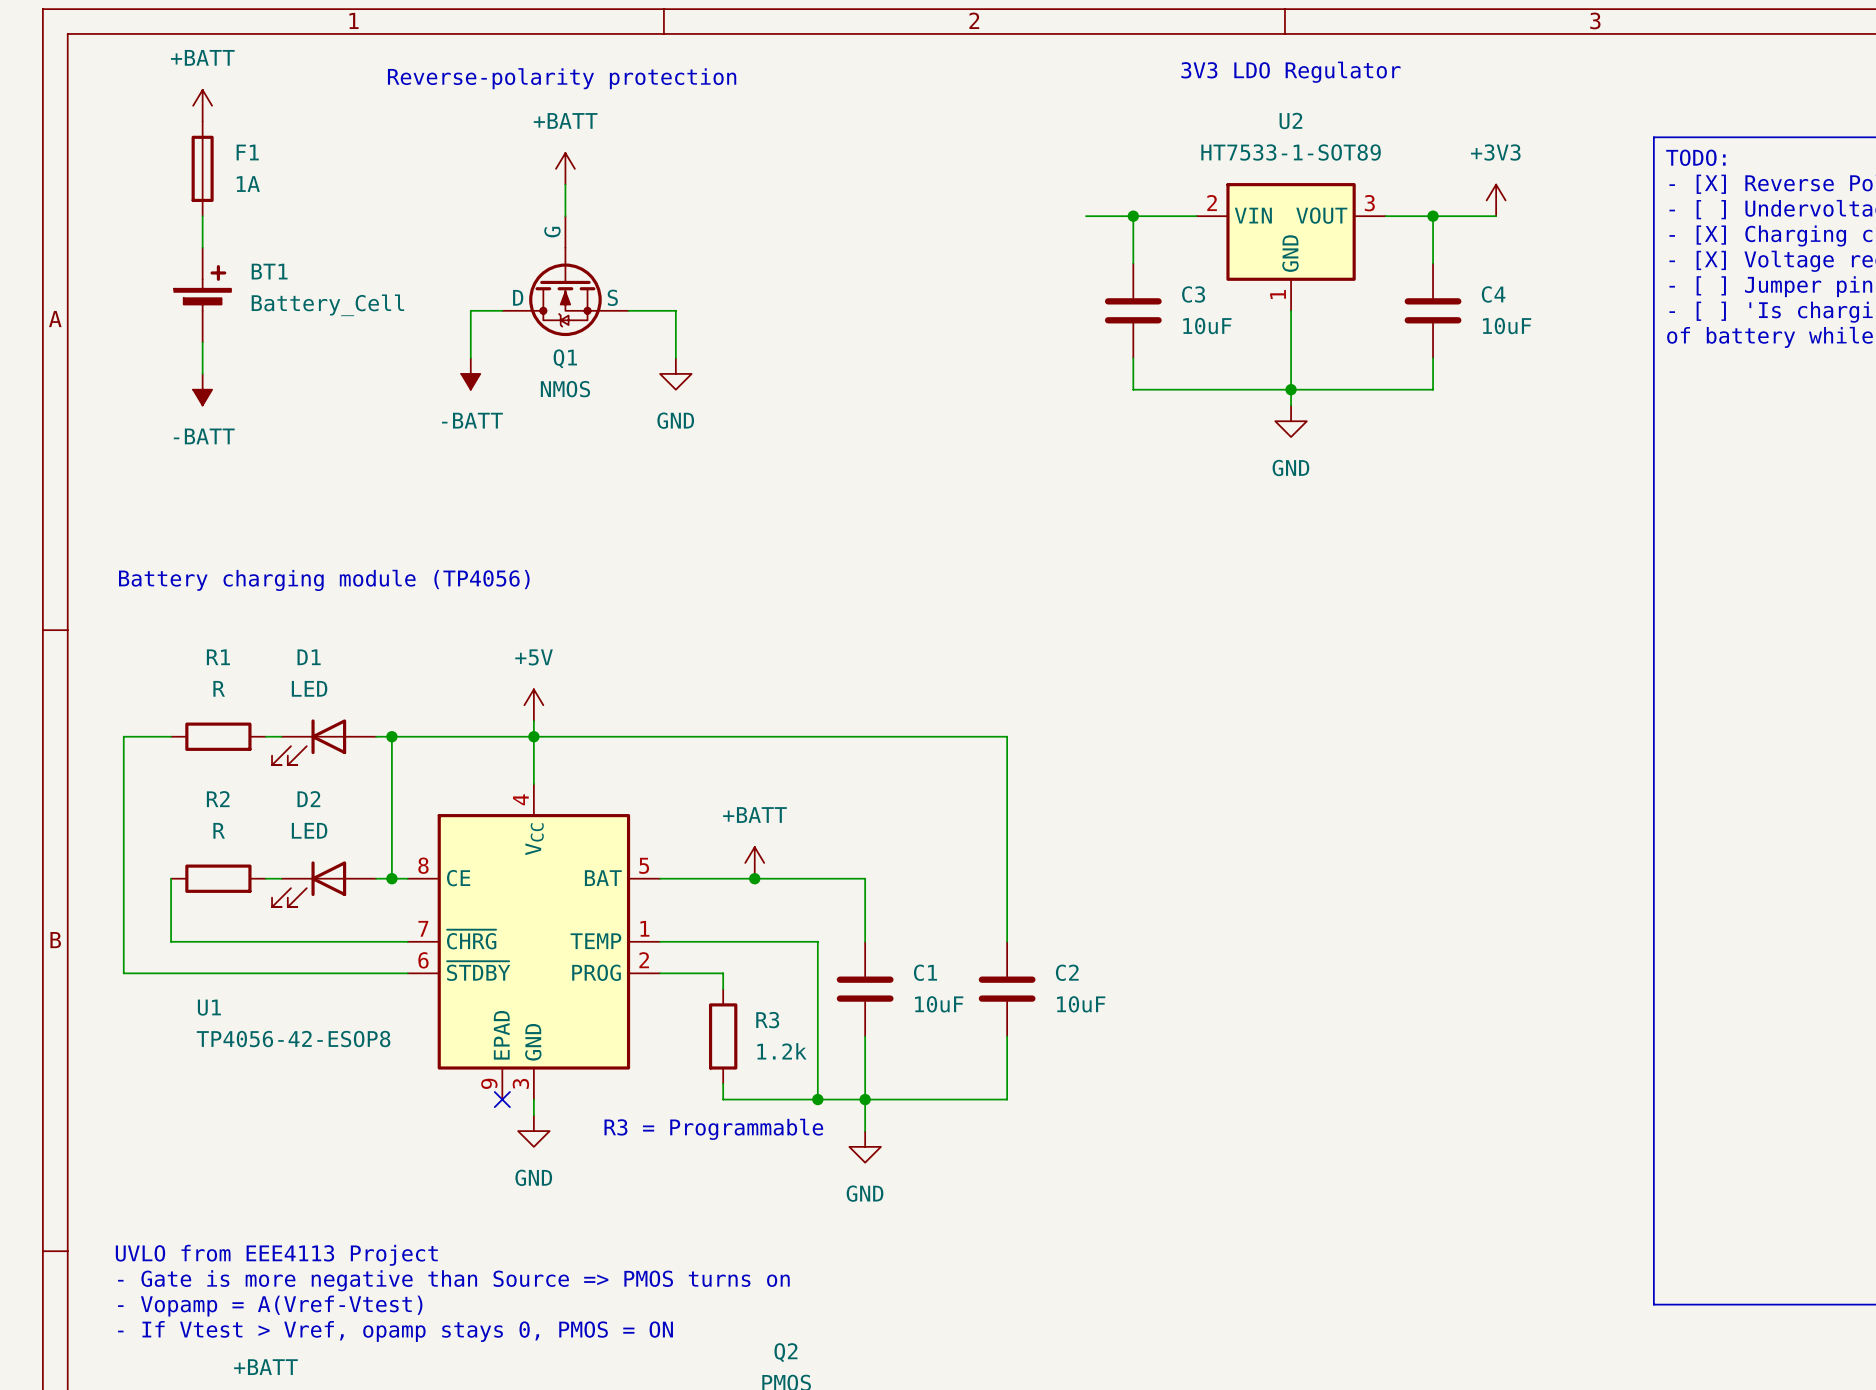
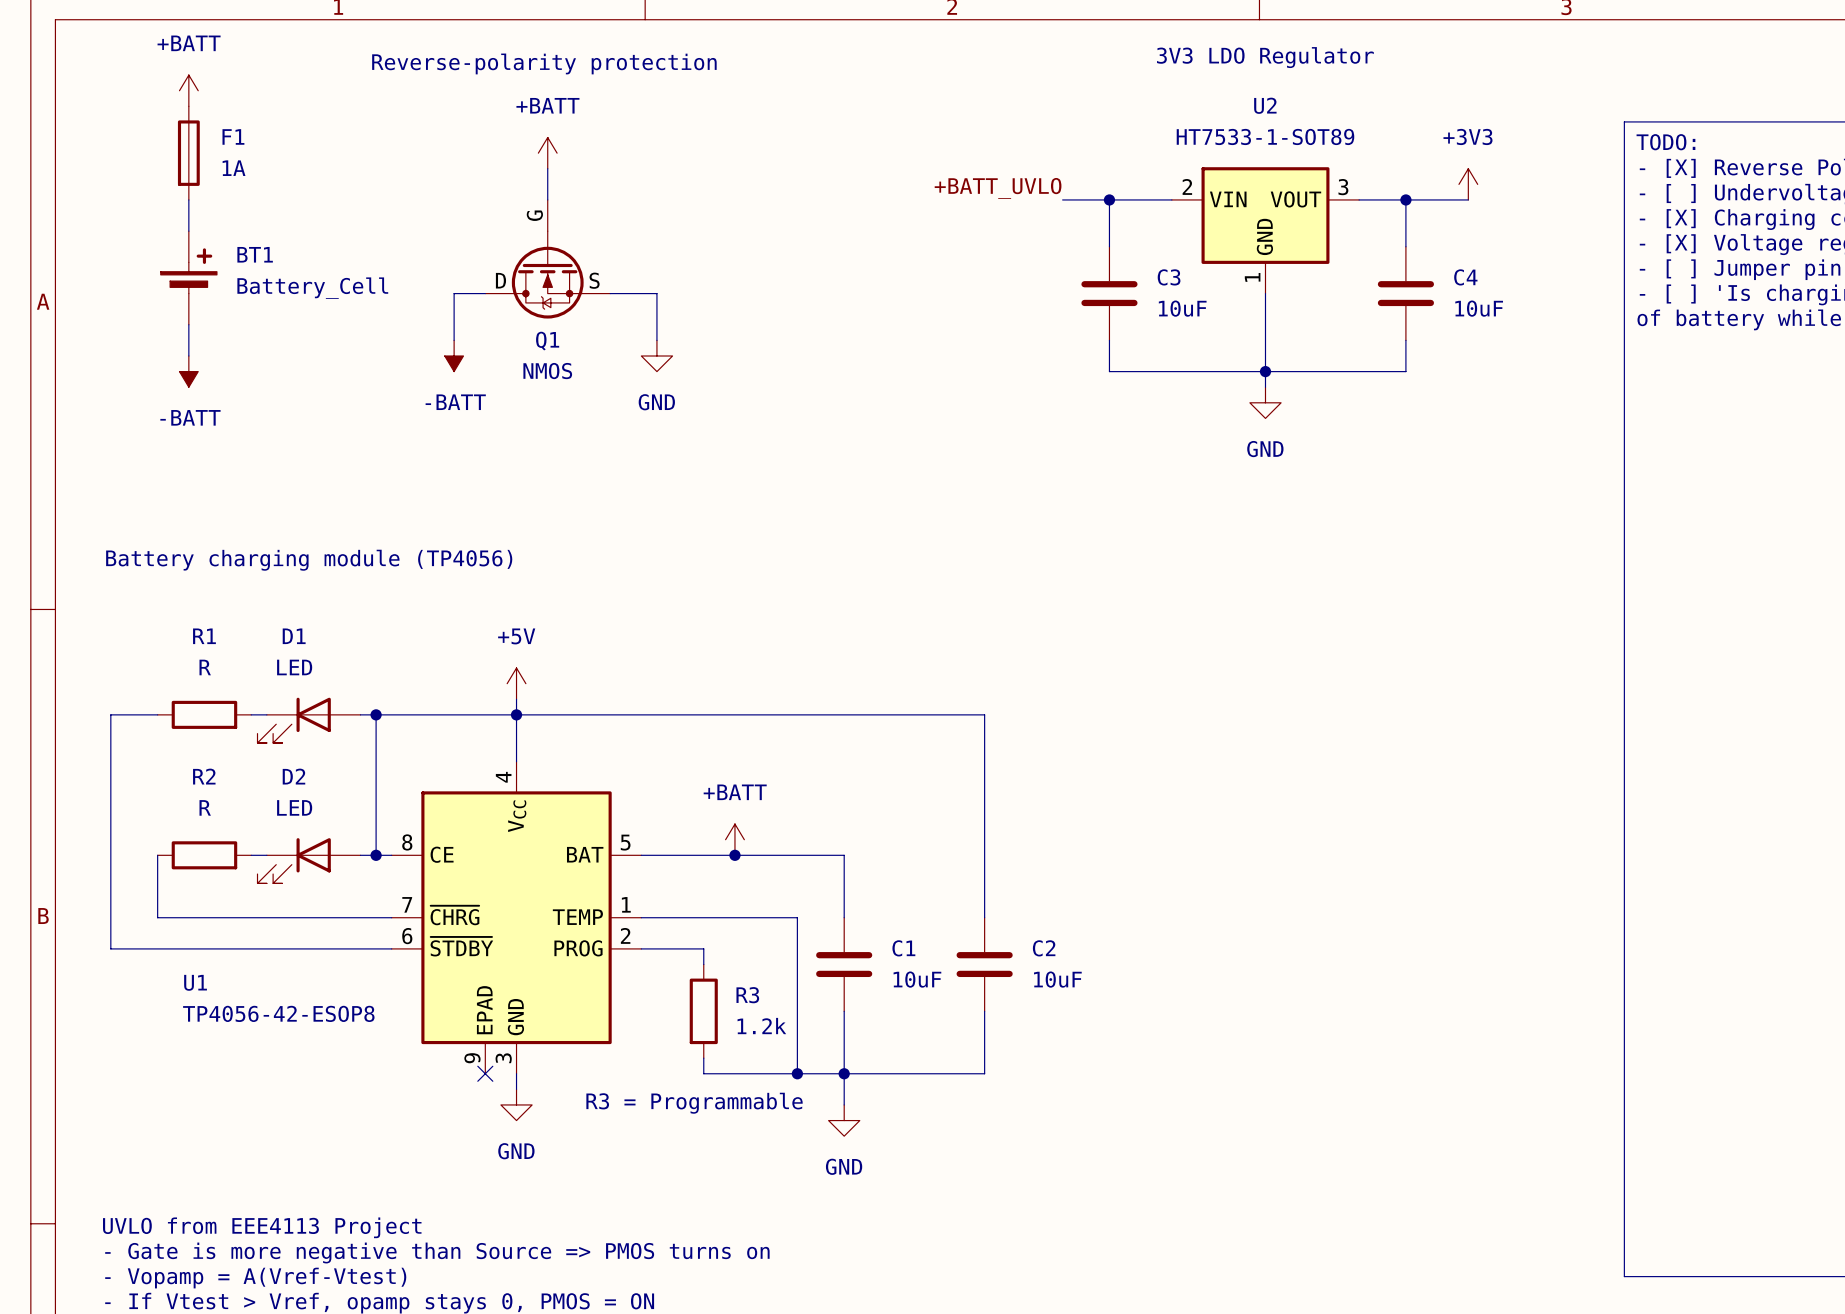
label: none -> +BATT_UVLO (998, 188)

